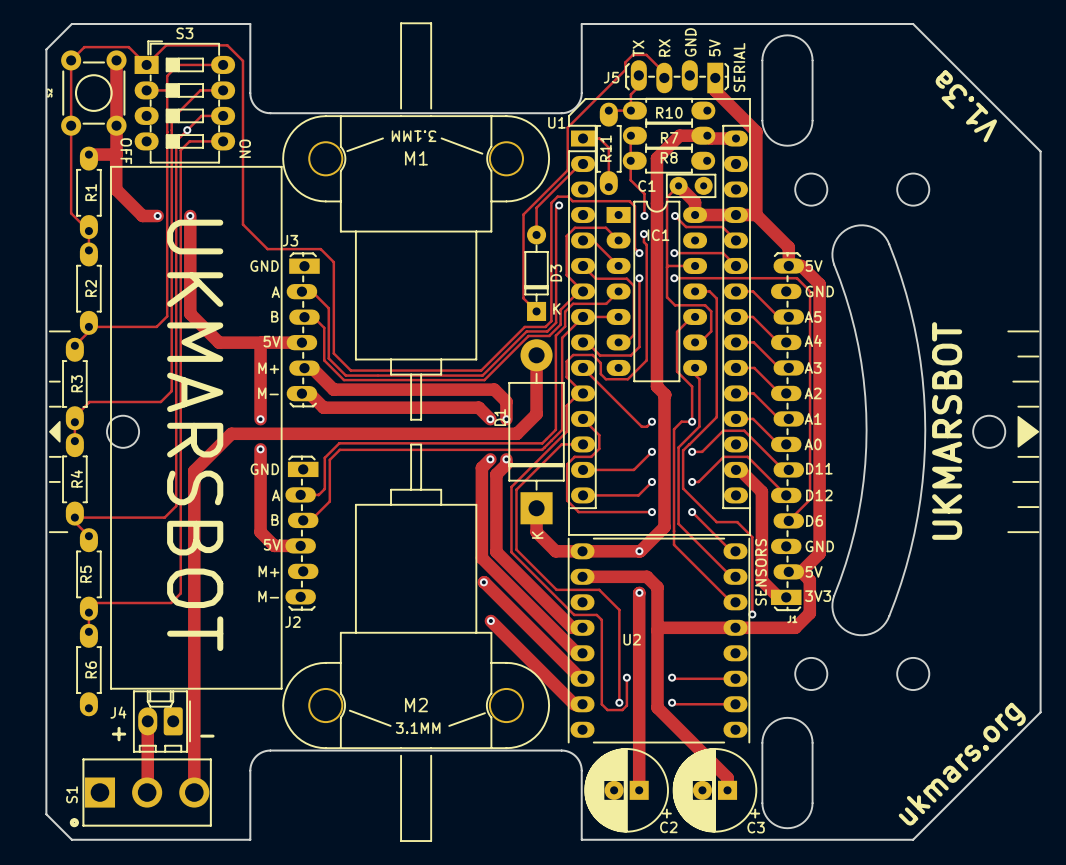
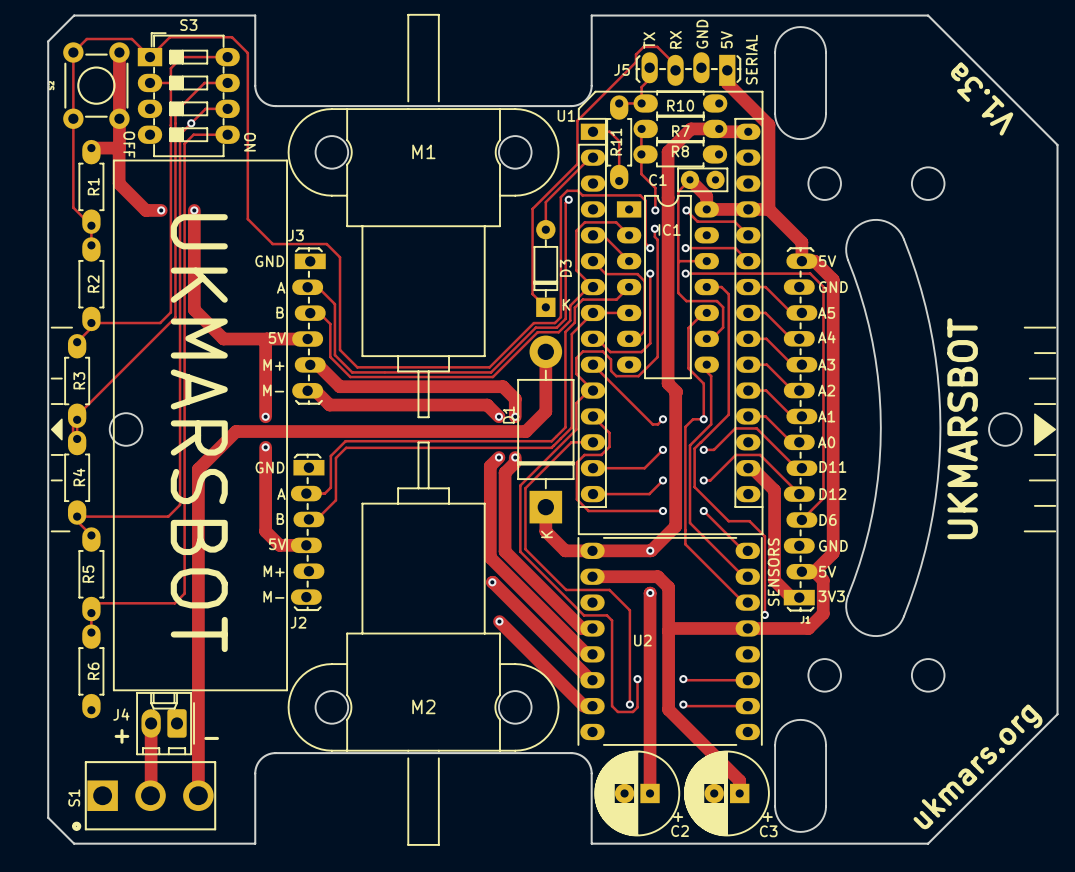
M1 footprint: [282, 22, 550, 421] -> [287, 14, 560, 418]
track: (171, 321) (171, 391) (160, 401) (89, 401) (74, 416) -> (175, 317) (73, 419) (73, 438)
M2 footprint: [282, 443, 550, 842] -> [287, 441, 560, 846]

